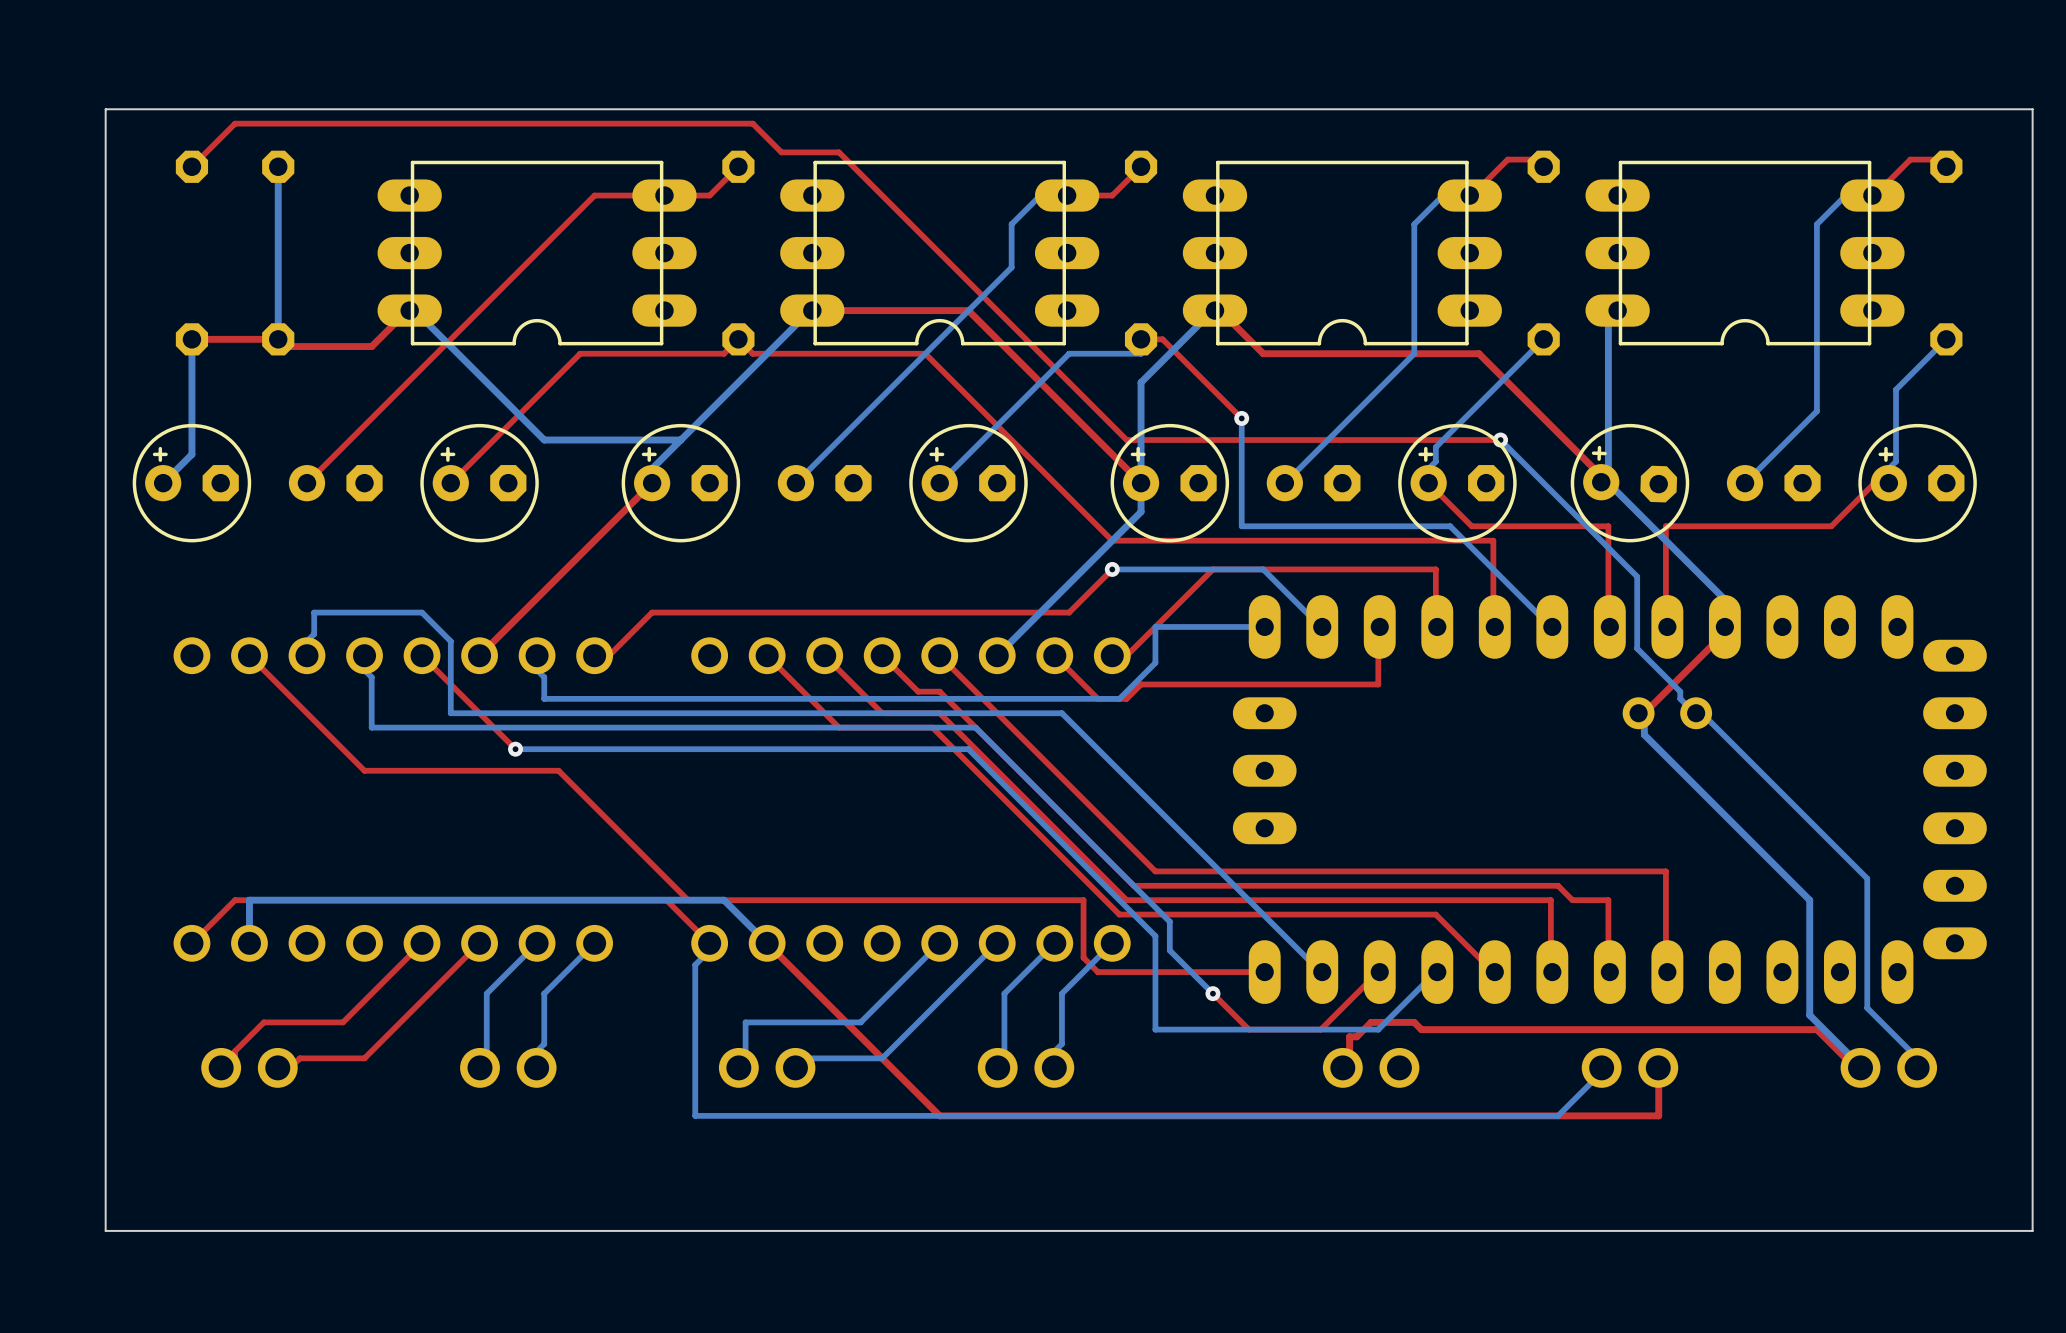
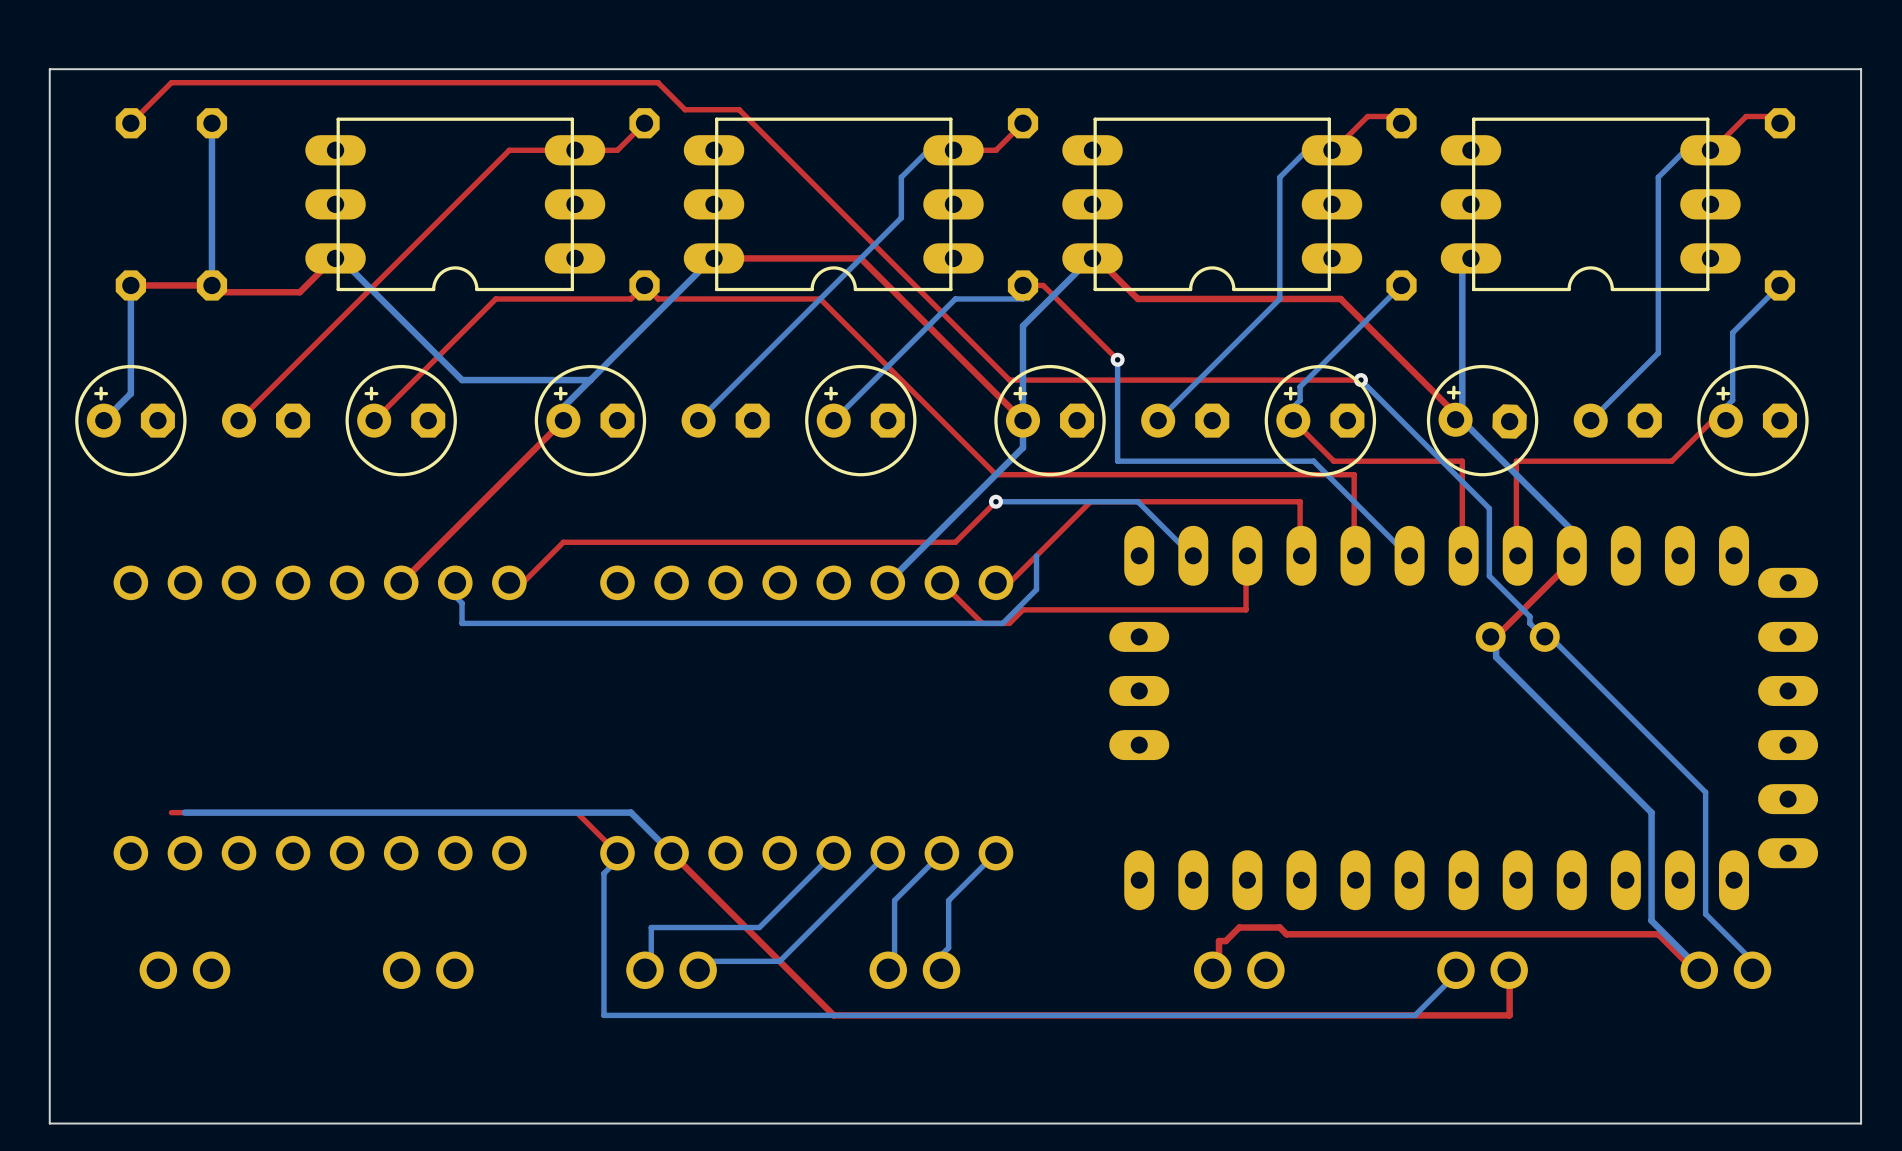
bottom track: (1264, 626) (1155, 626) -> none
top track: (249, 655) (364, 770) (558, 770) (688, 900) (1083, 900) (1083, 957) (1097, 972) (1264, 972) -> none
bottom track: (306, 655) (306, 641) (314, 634) (314, 612) (422, 612) (450, 641) (450, 713) (1061, 713) (1322, 972) -> none
bottom track: (364, 655) (364, 670) (371, 677) (371, 727) (975, 727) (1169, 921) (1169, 950) (1212, 993) -> none
top track: (422, 655) (515, 749) -> none
top track: (767, 655) (839, 727) (932, 727) (1119, 914) (1435, 914) (1494, 972) -> none
top track: (824, 655) (882, 713) (939, 713) (1126, 900) (1550, 900) (1552, 972) -> none
top track: (882, 655) (918, 691) (939, 691) (1133, 885) (1558, 885) (1572, 900) (1608, 900) (1609, 972) -> none
top track: (939, 655) (1155, 871) (1665, 871) (1667, 972) -> none
bottom track: (515, 749) (968, 749) (1155, 936) (1155, 1029) (1378, 1029) (1437, 972) -> none
via: (515, 749) -> none
top track: (235, 900) (191, 943) -> none
bottom track: (249, 900) (249, 943) -> none
top track: (422, 943) (342, 1022) (263, 1022) (235, 1051) (235, 1065) (221, 1067) -> none
top track: (479, 943) (364, 1058) (299, 1058) (292, 1065) (278, 1065) (277, 1067) -> none
bottom track: (537, 943) (486, 993) (486, 1065) (480, 1067) -> none
bottom track: (594, 943) (544, 993) (544, 1043) (537, 1051) (536, 1067) -> none
top track: (1379, 972) (1320, 1029) (1248, 1029) (1212, 993) -> none
via: (1212, 993) -> none

